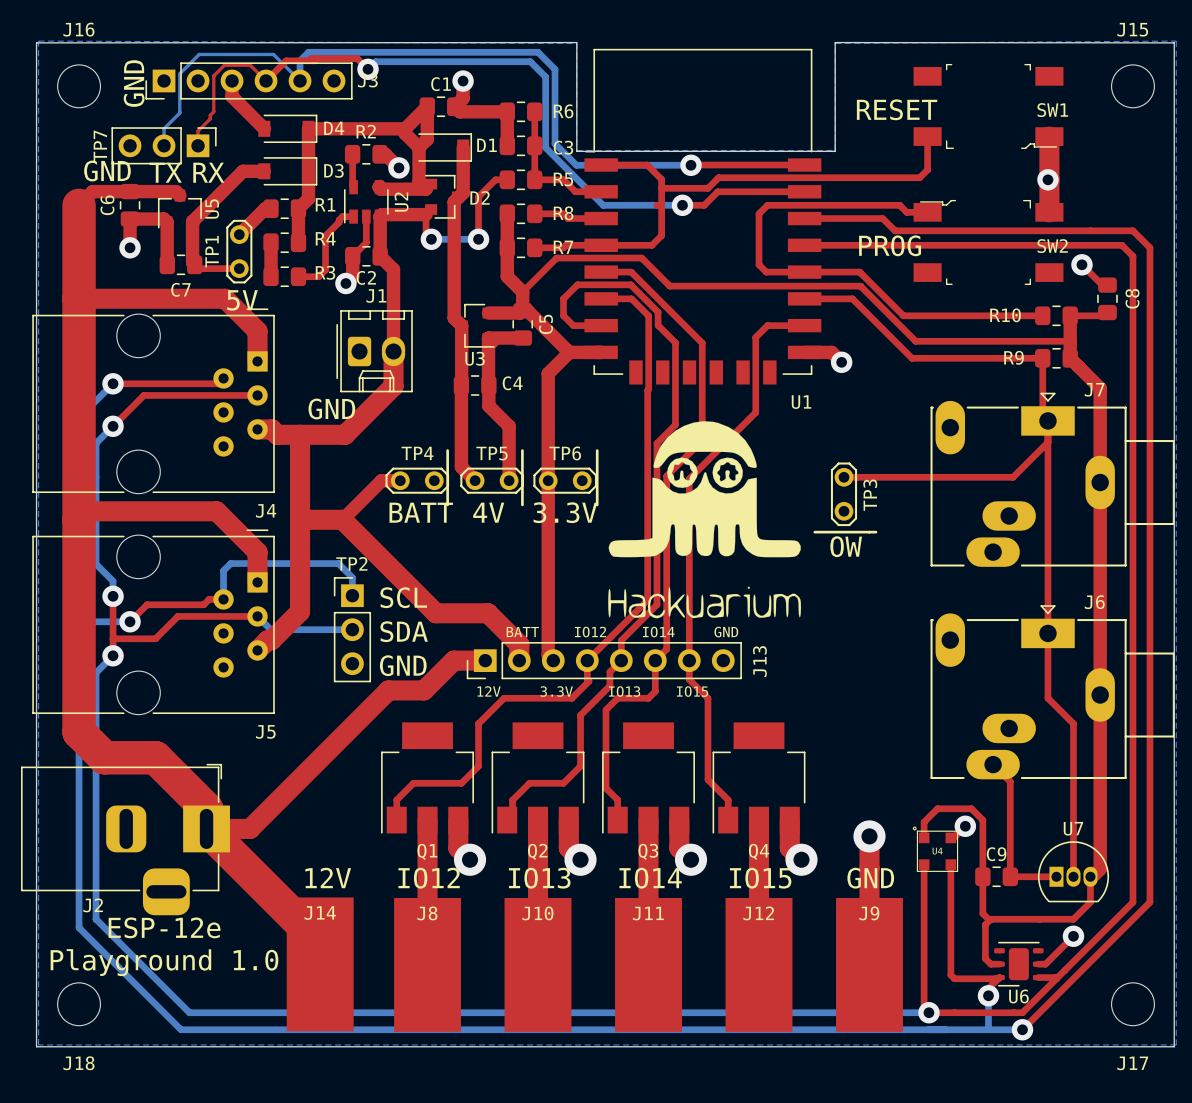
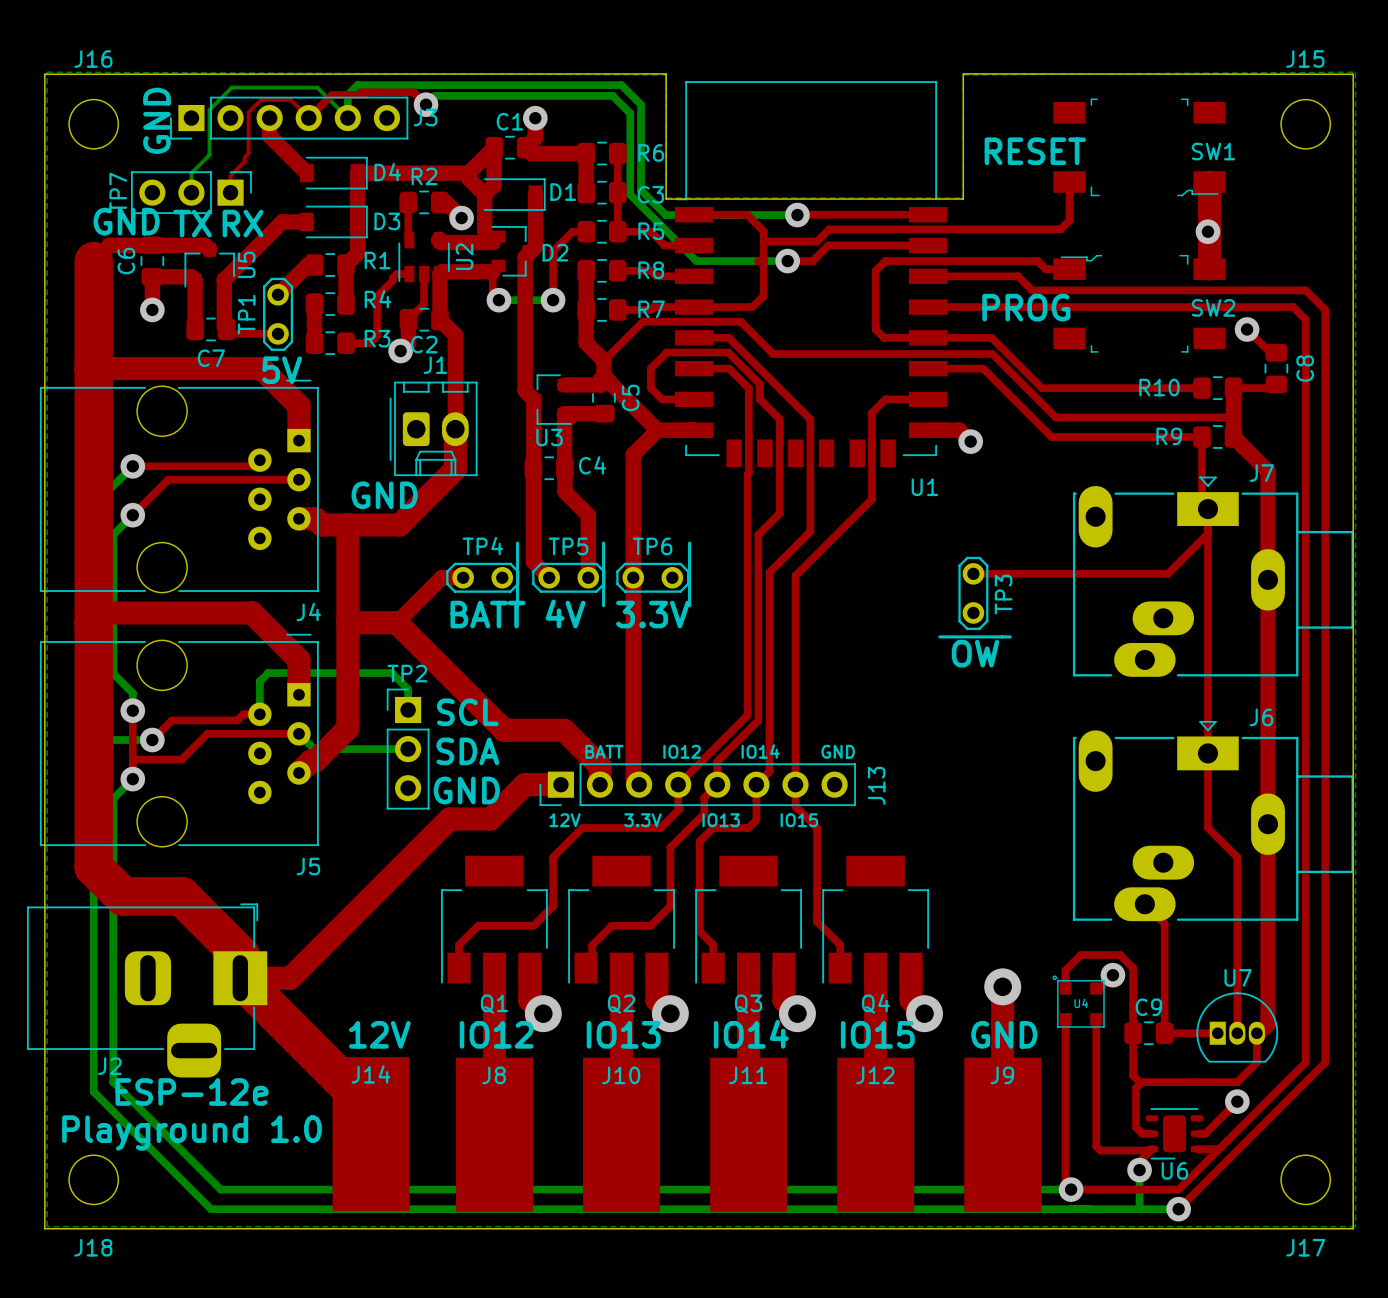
drawing: [608, 421, 802, 619] -> none

